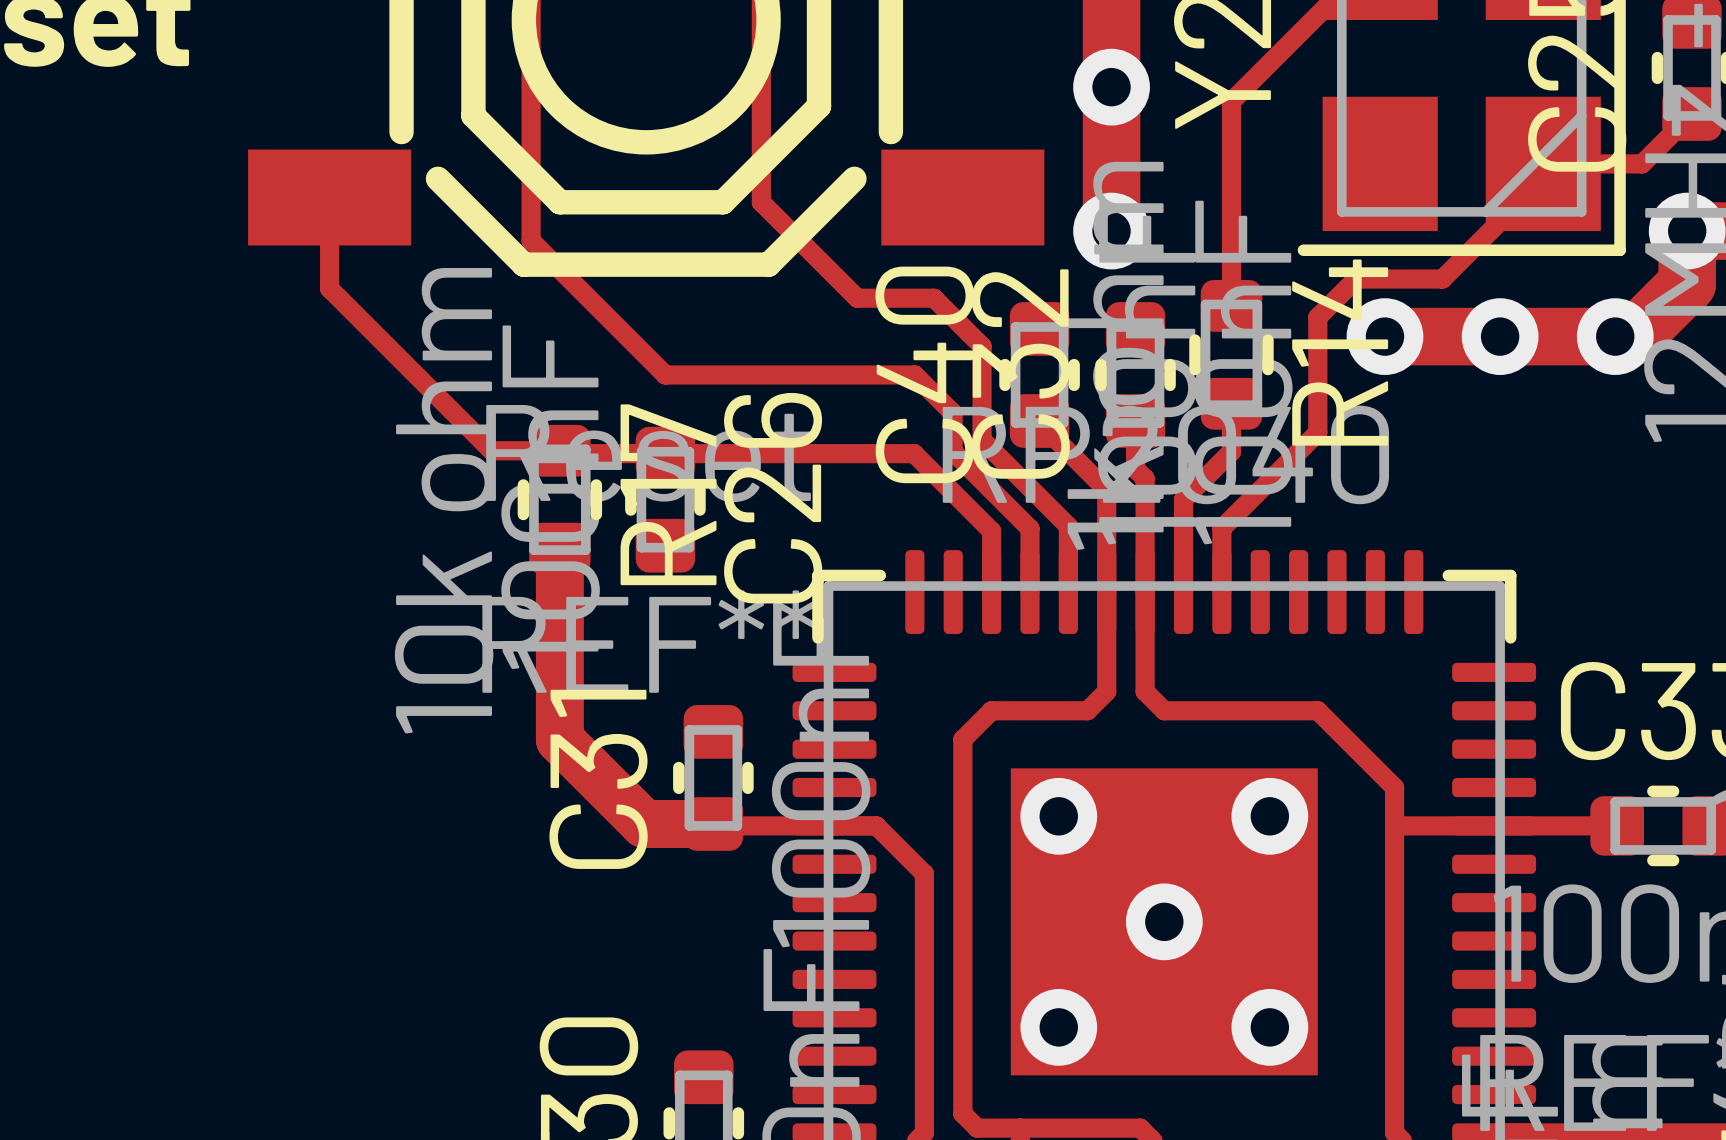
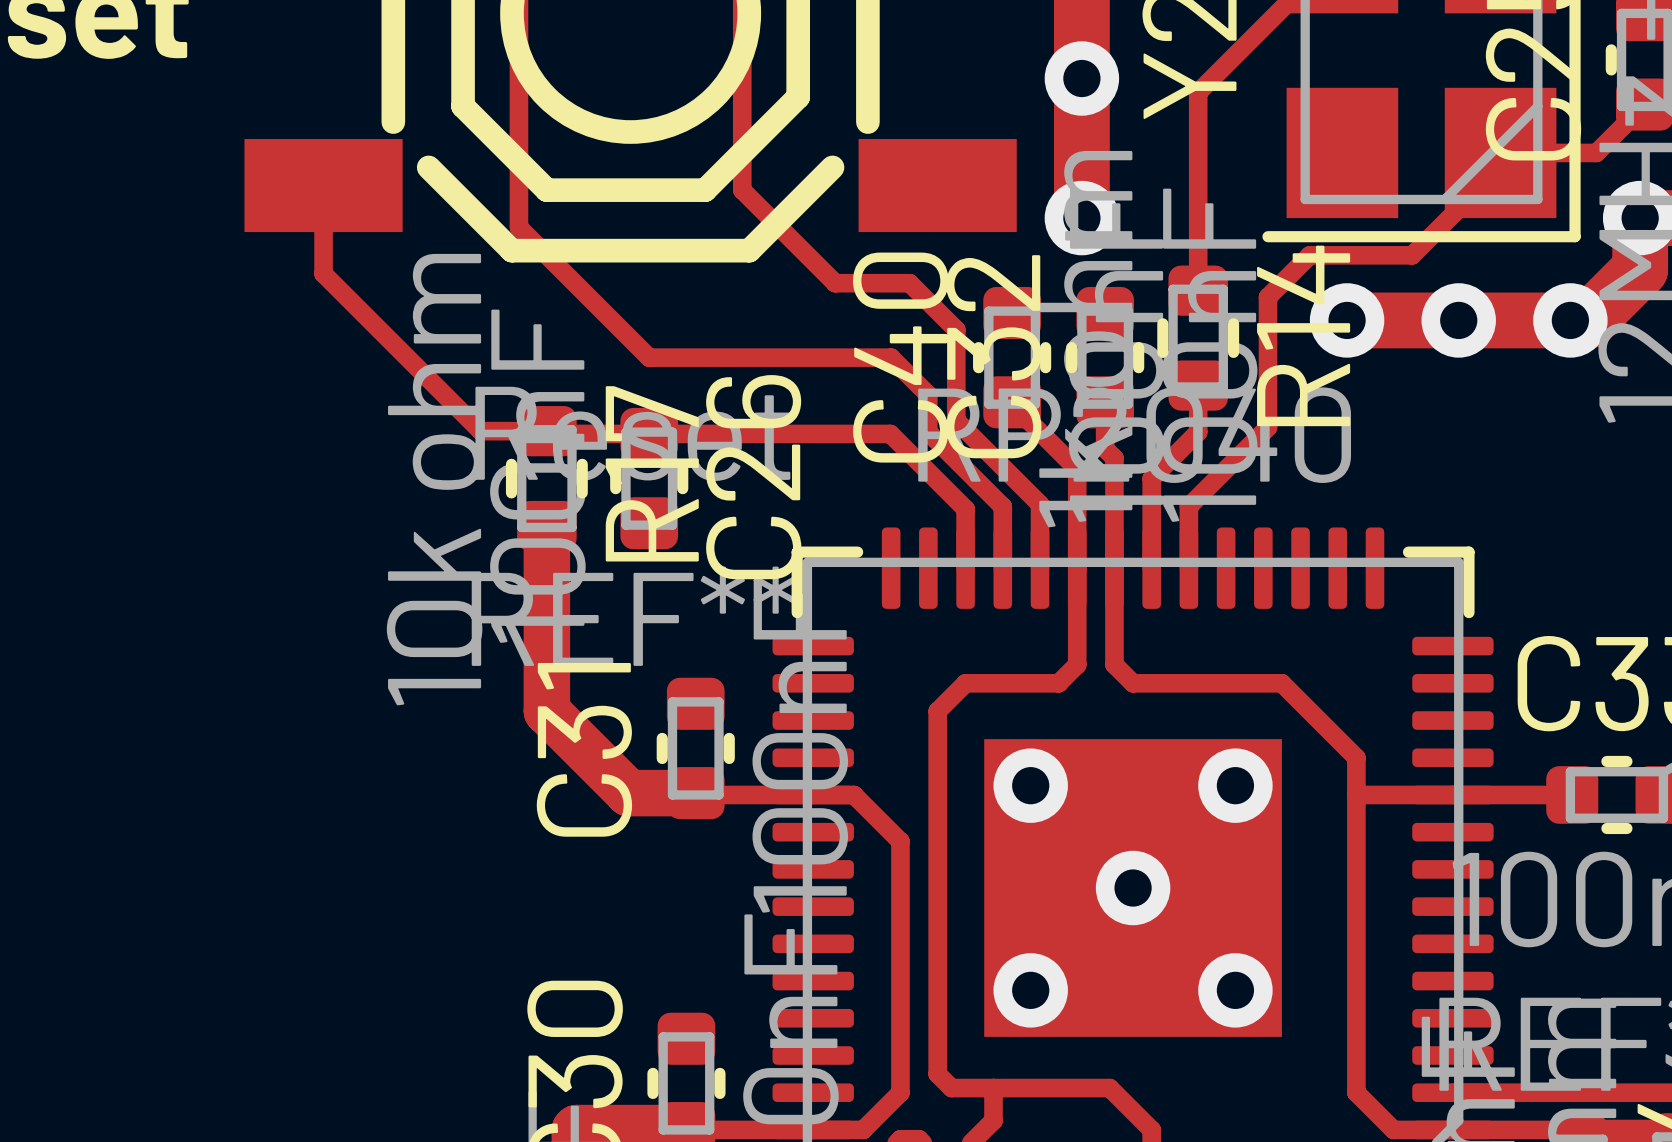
top track: (1452, 269) (1442, 279) (1356, 279) (1317, 317) (1317, 432) (1303, 446) -> (1412, 255) (1309, 255) (1267, 297) (1267, 427)

